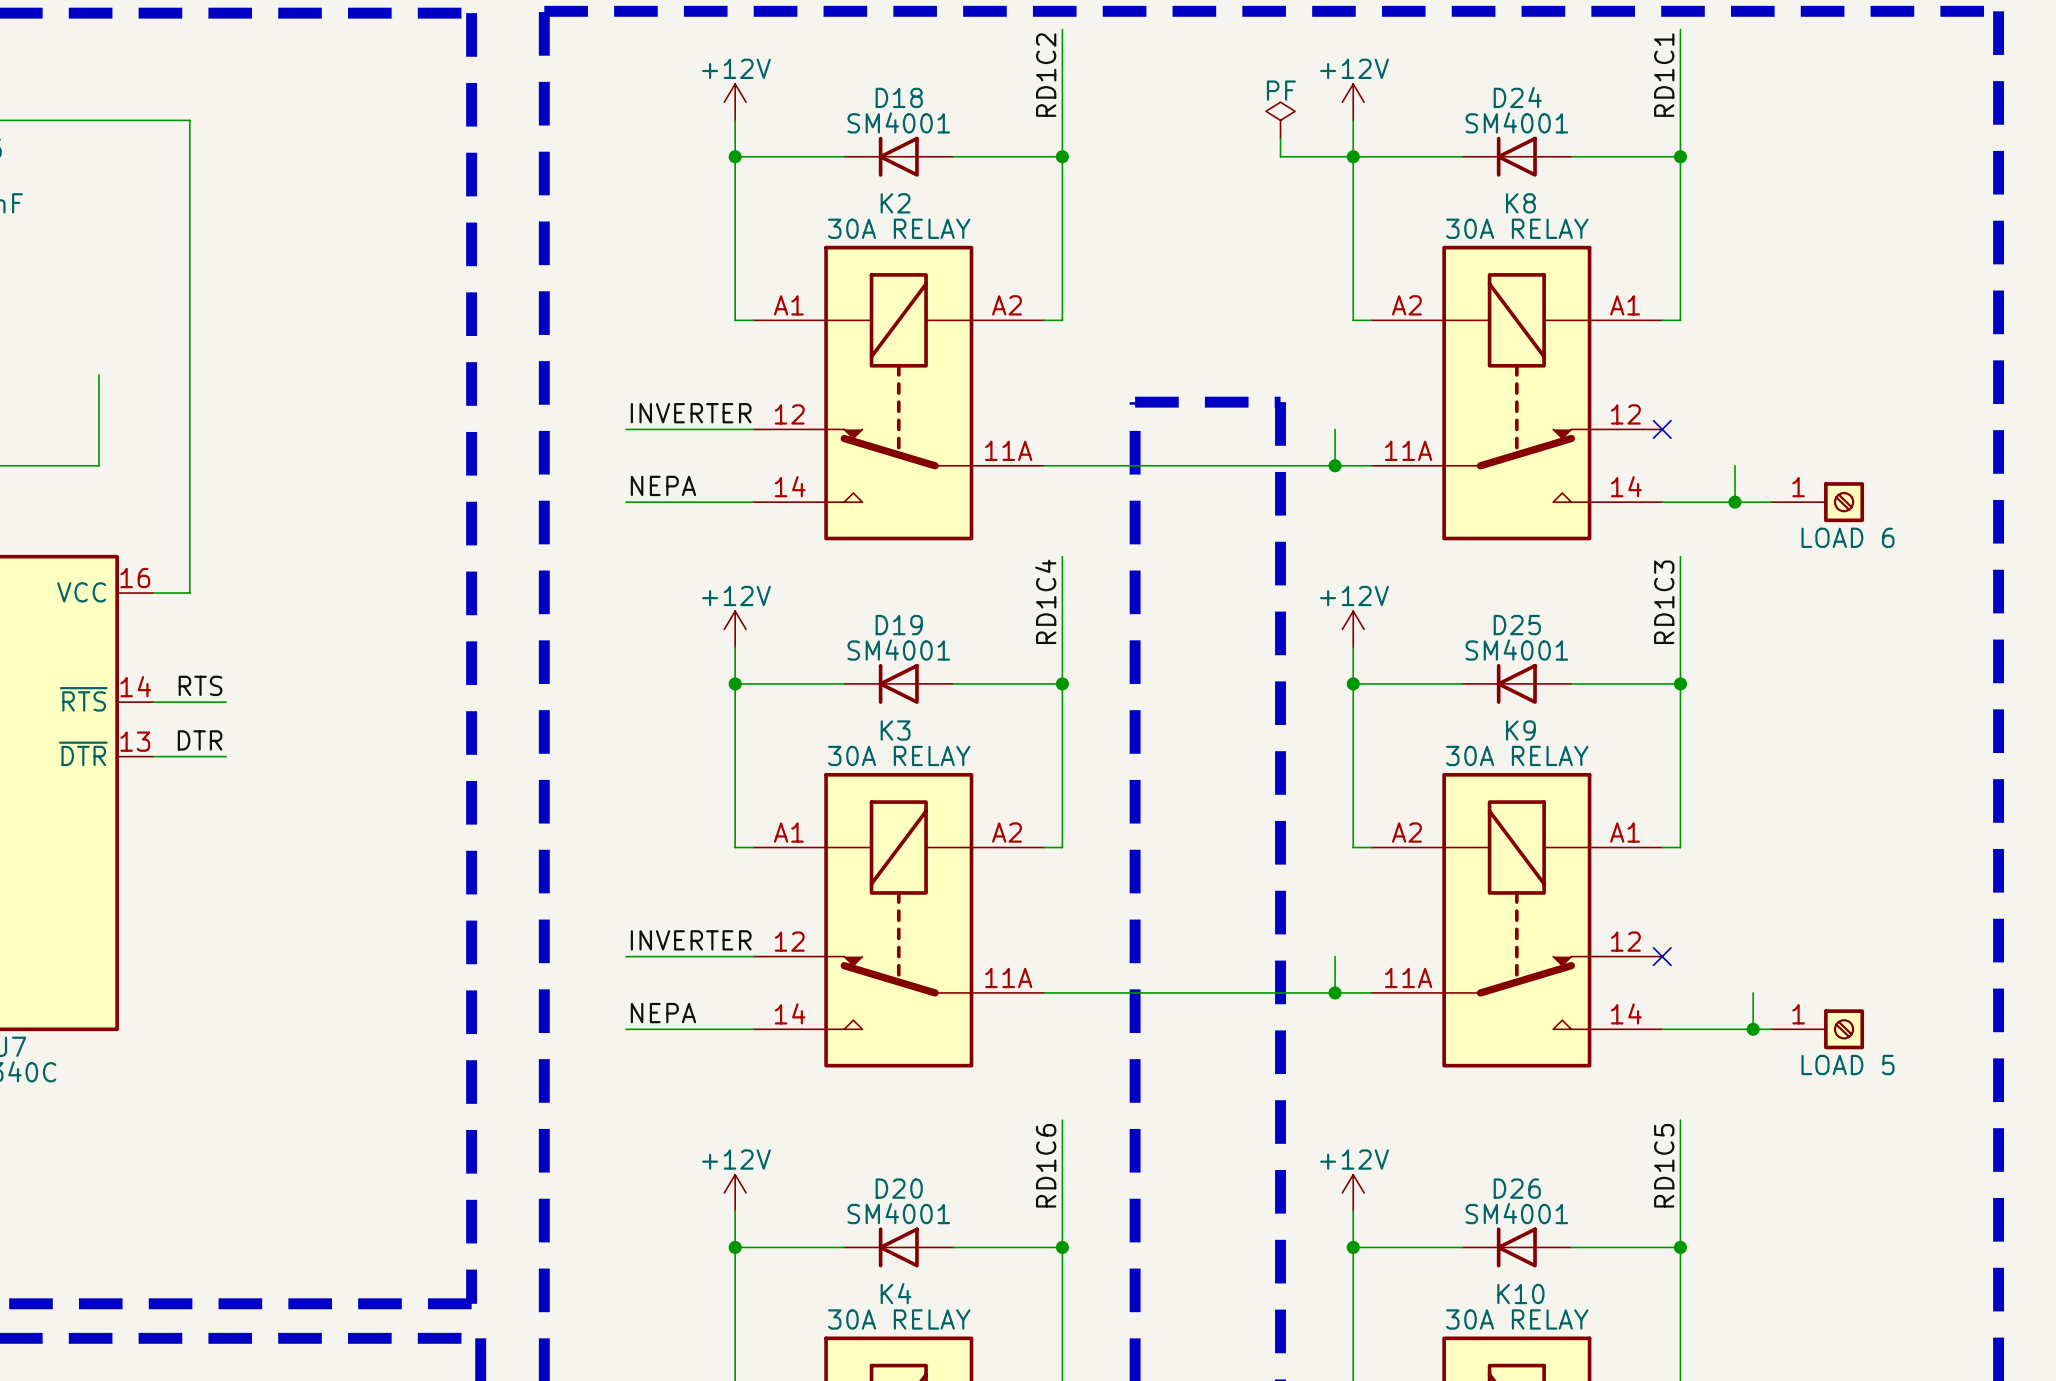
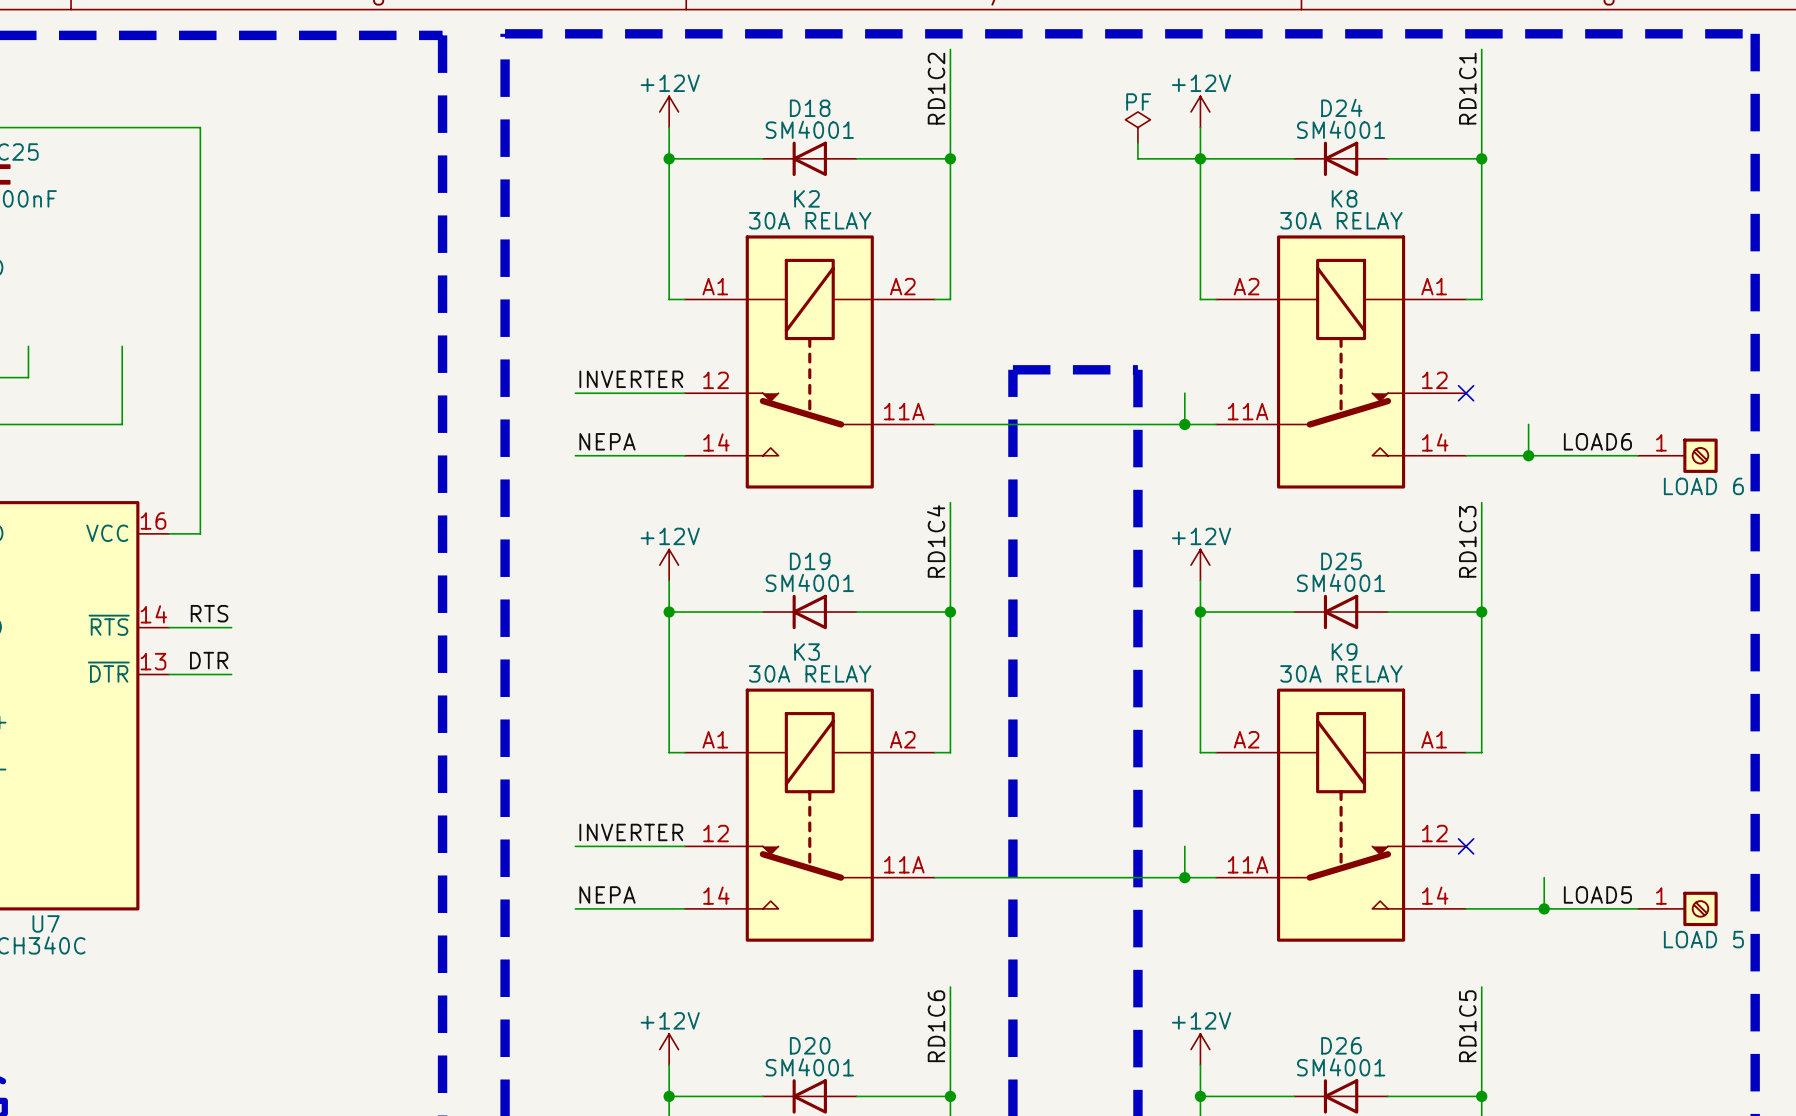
label: none -> LOAD6 (1597, 441)
part position: (1817, 502) -> (1677, 455)
label: none -> LOAD5 (1597, 894)
part position: (1817, 1029) -> (1677, 908)

